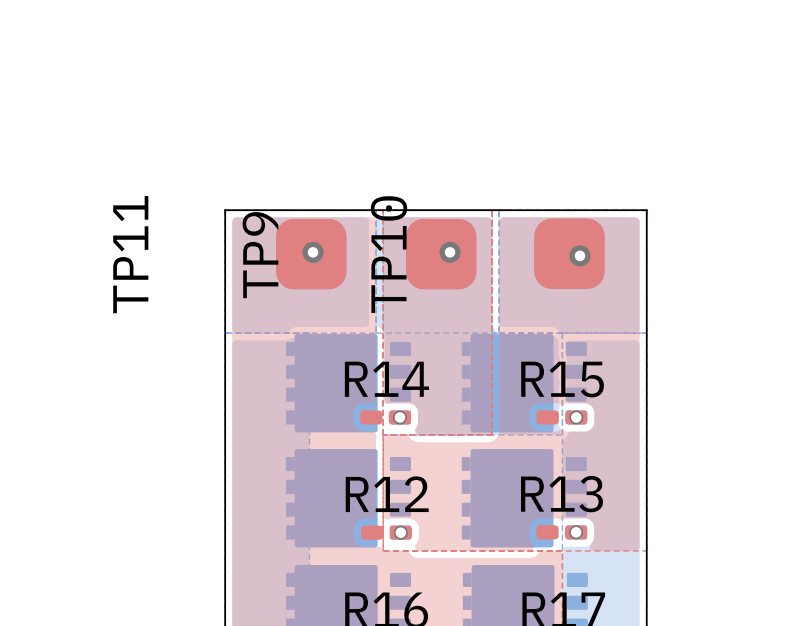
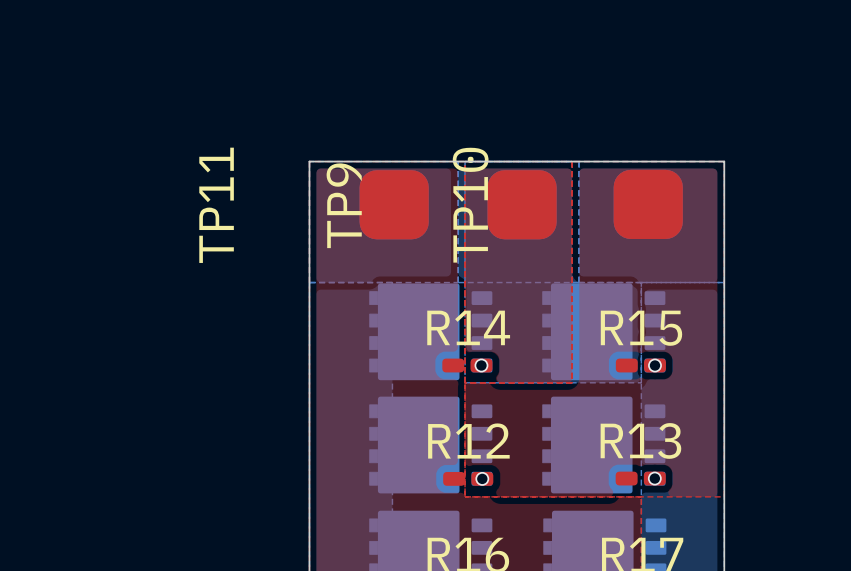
via: (313, 252) -> none
via: (450, 252) -> none
via: (579, 255) -> none

